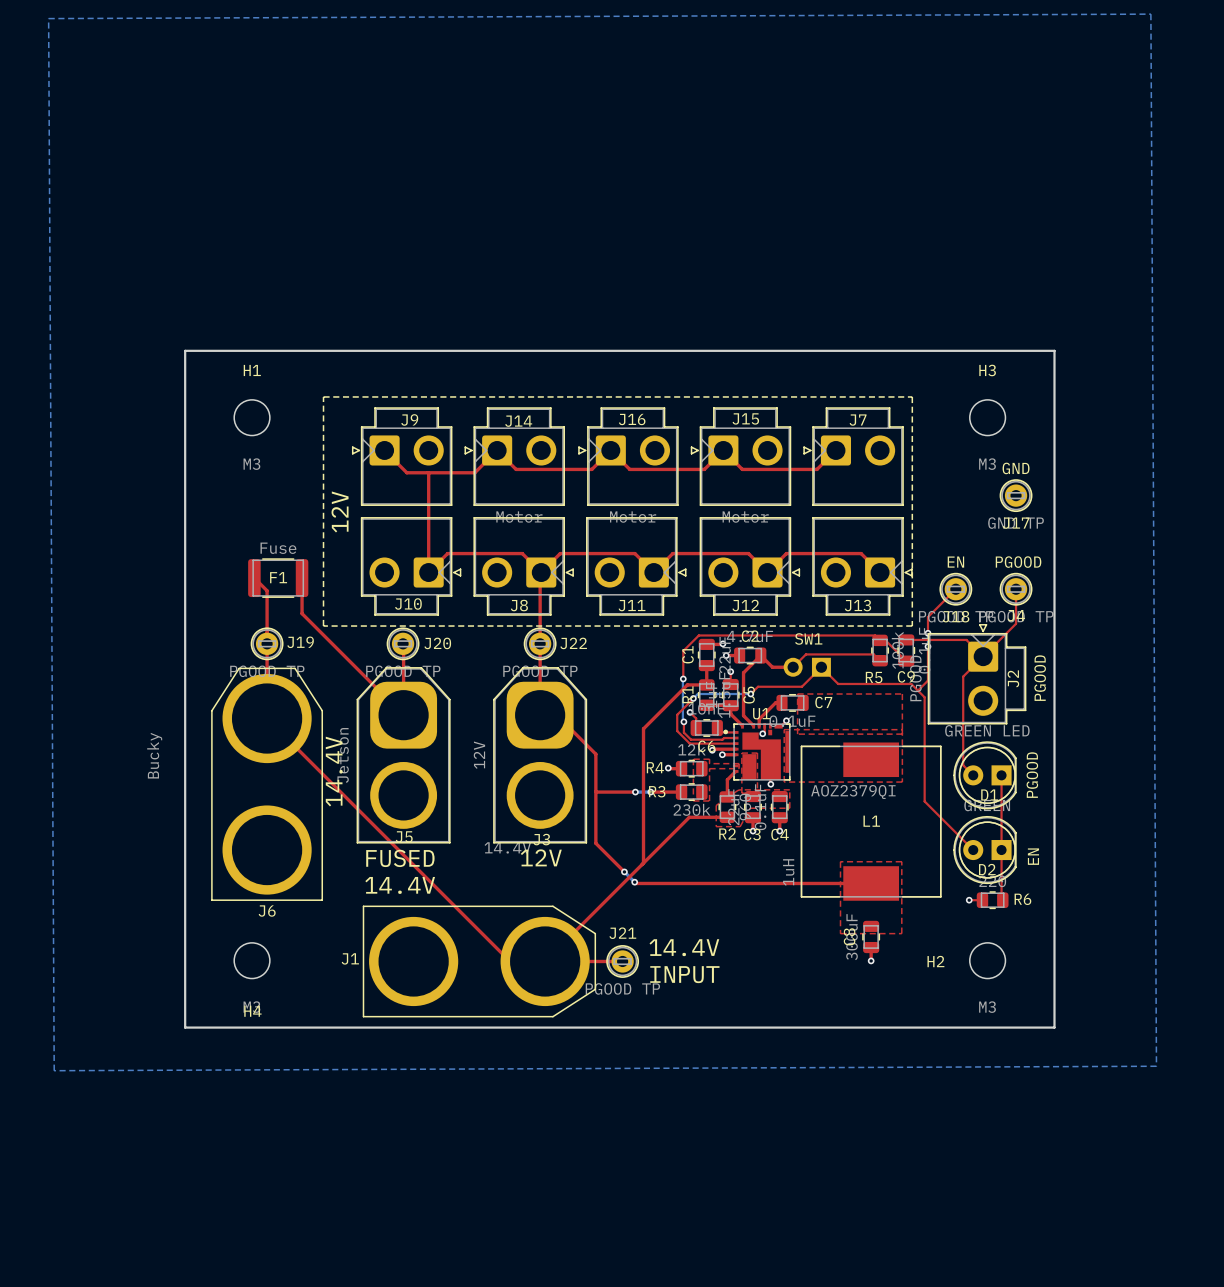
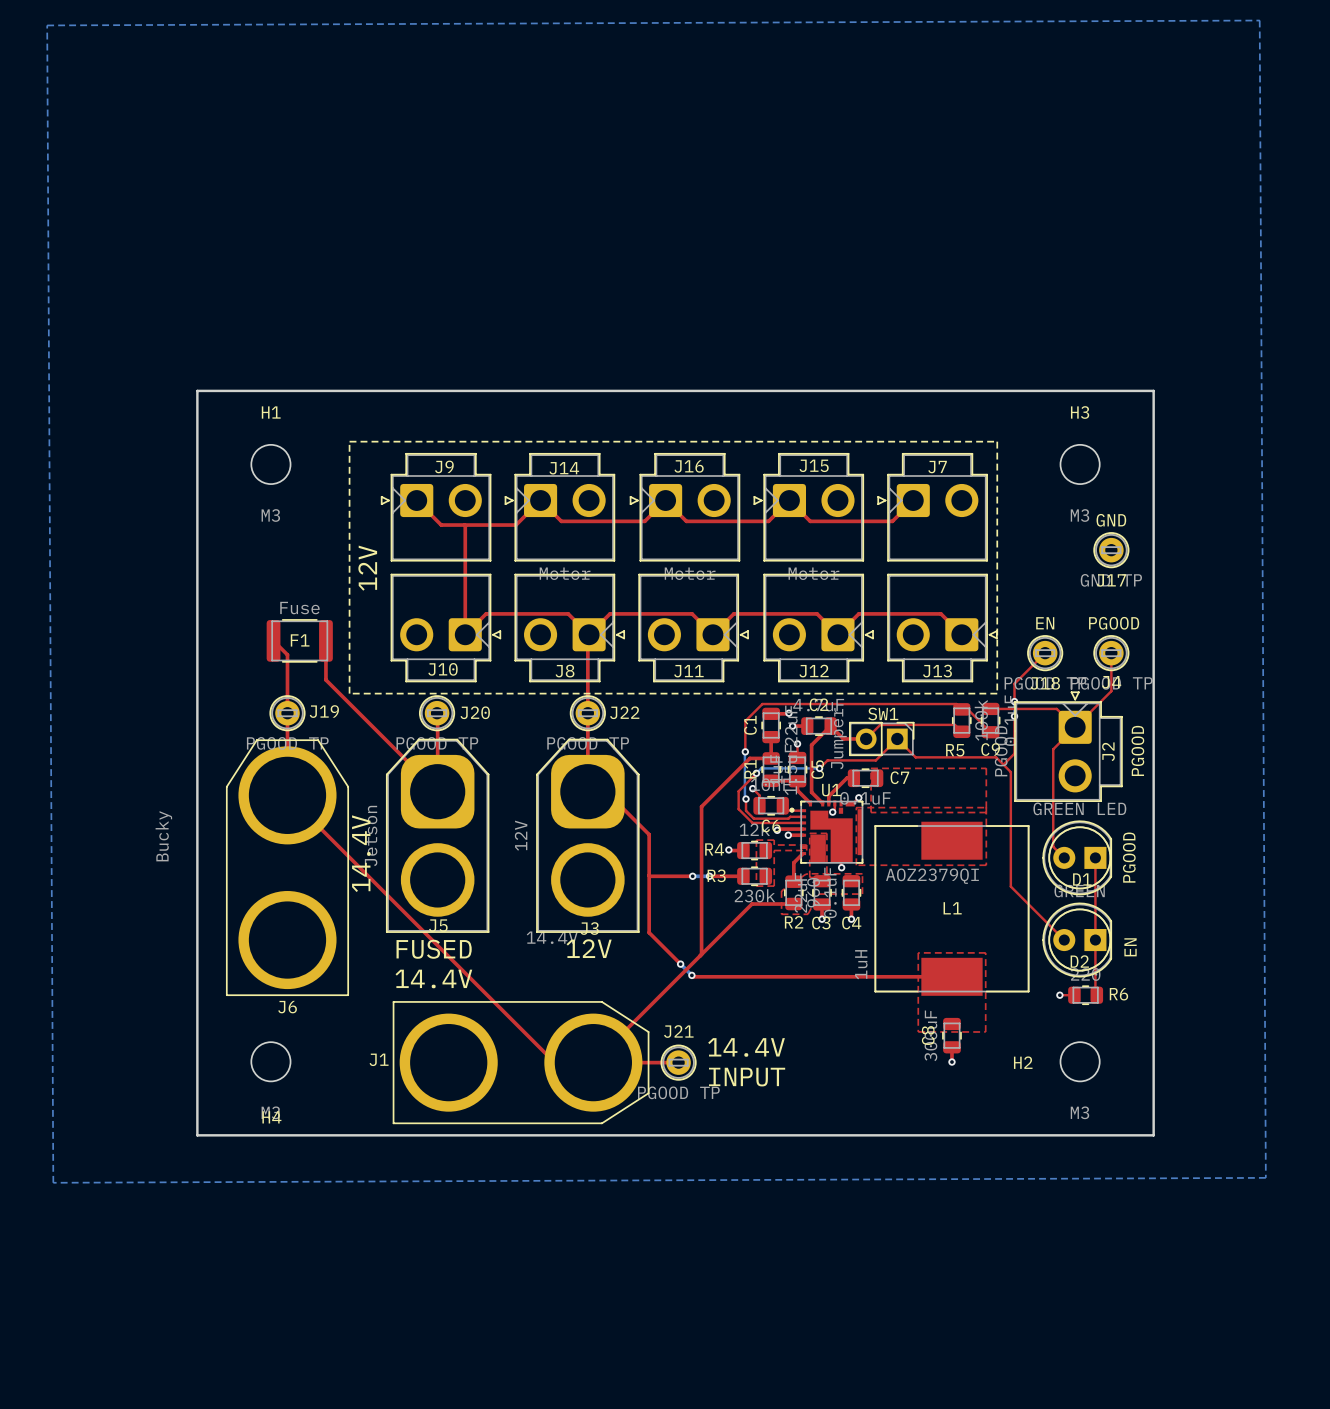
text: SW1 (808, 638) -> none
SW1 side: bottom (807, 667) -> top (881, 738)

